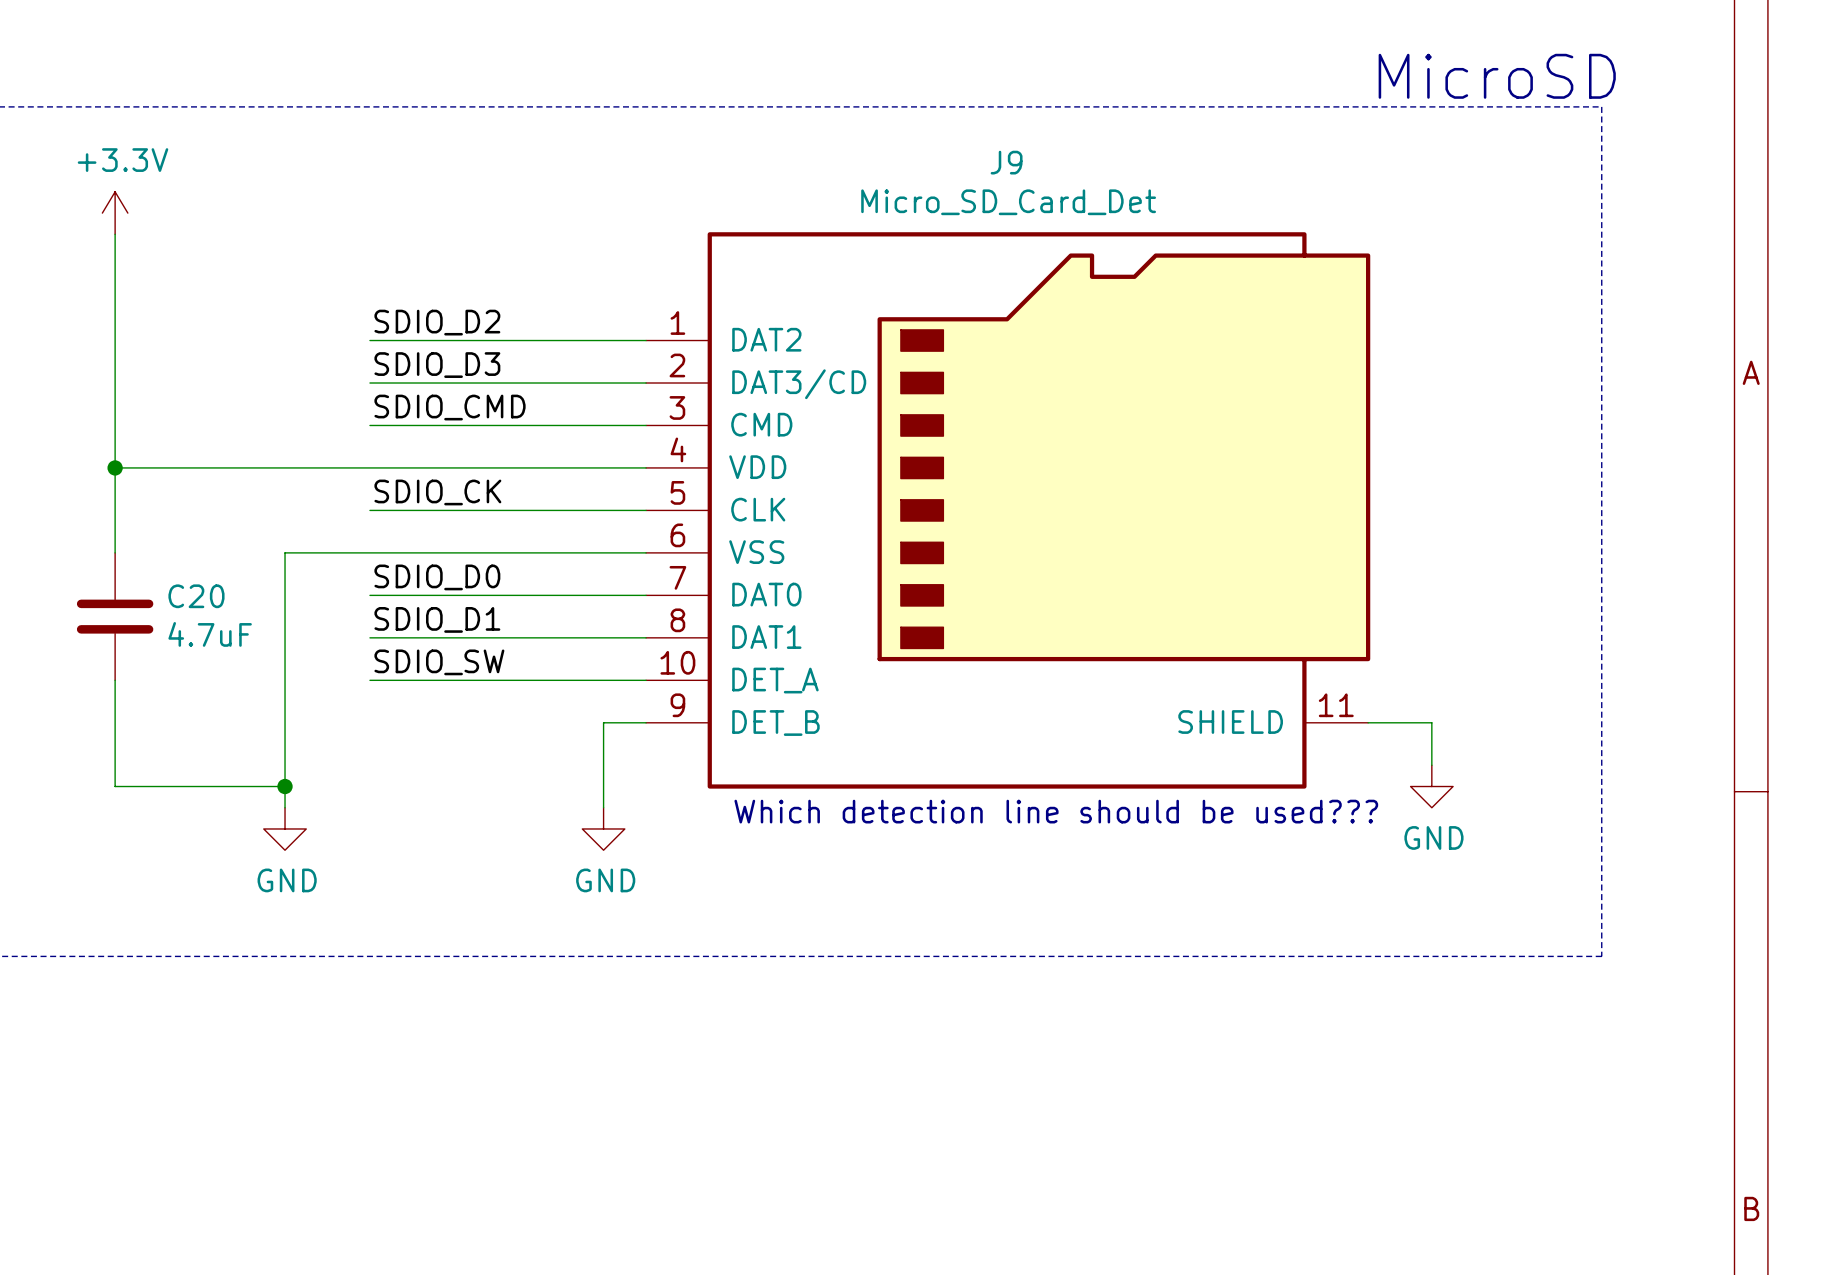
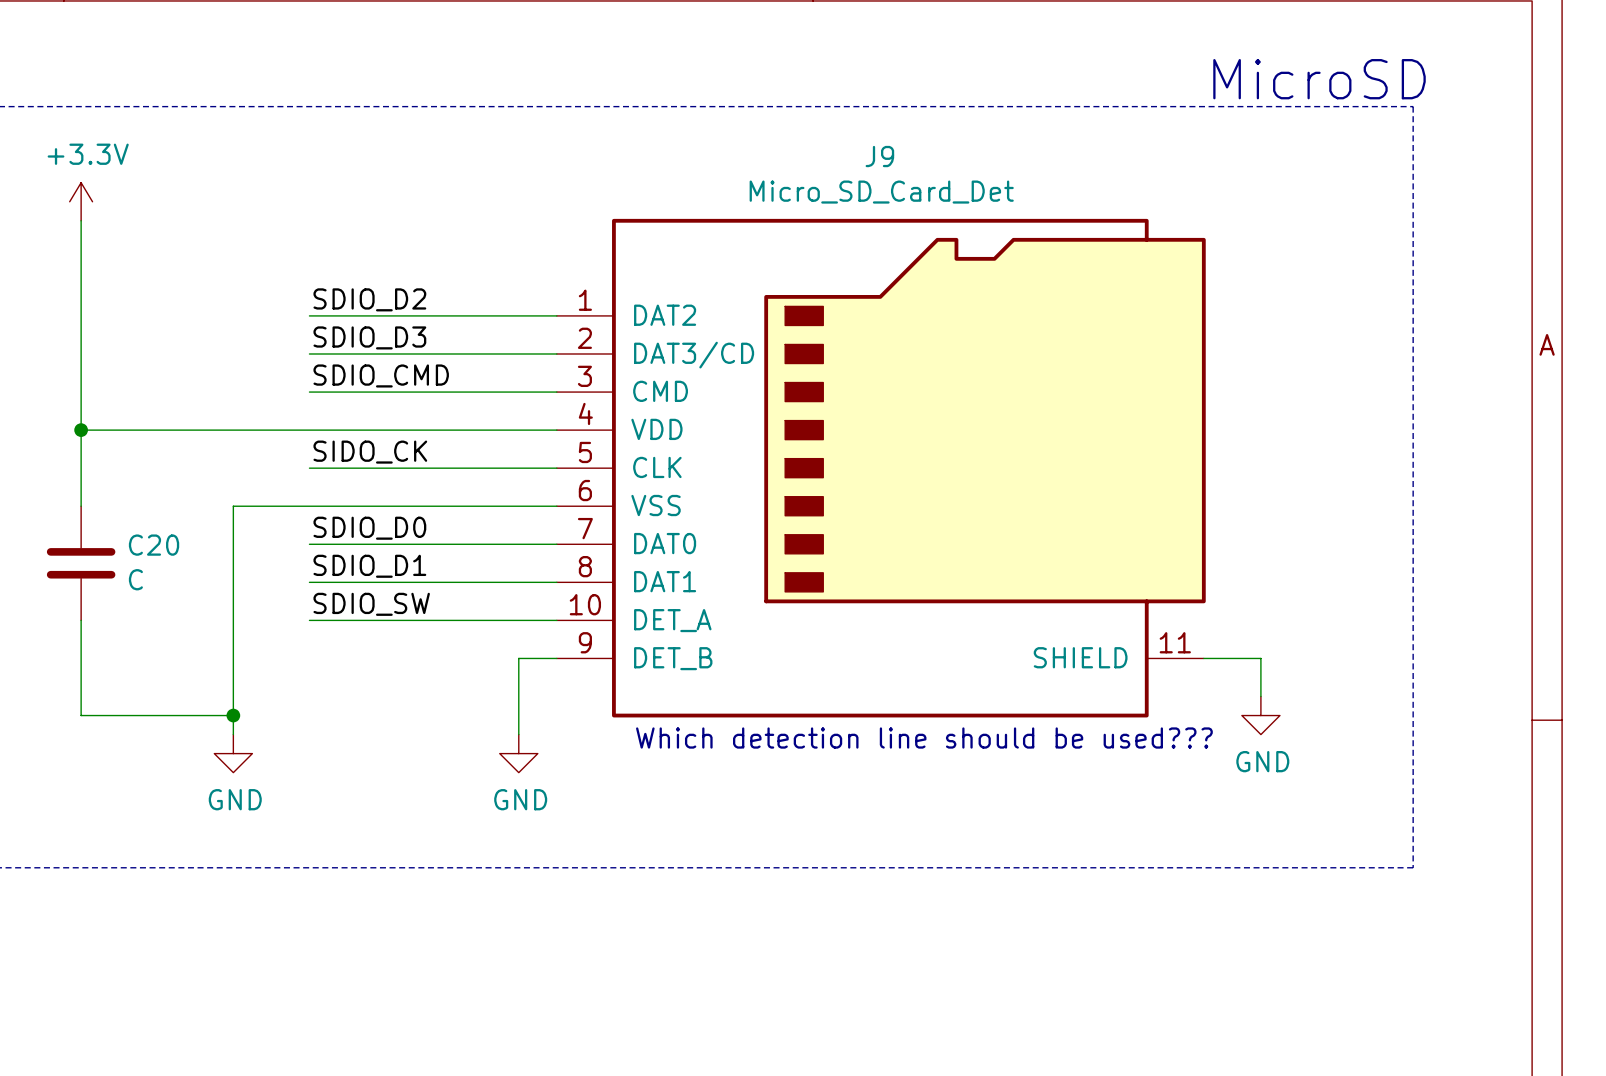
label: SDIO_CK (437, 492) -> SIDO_CK (370, 452)
C20 value: 4.7uF (210, 634) -> C (135, 579)

